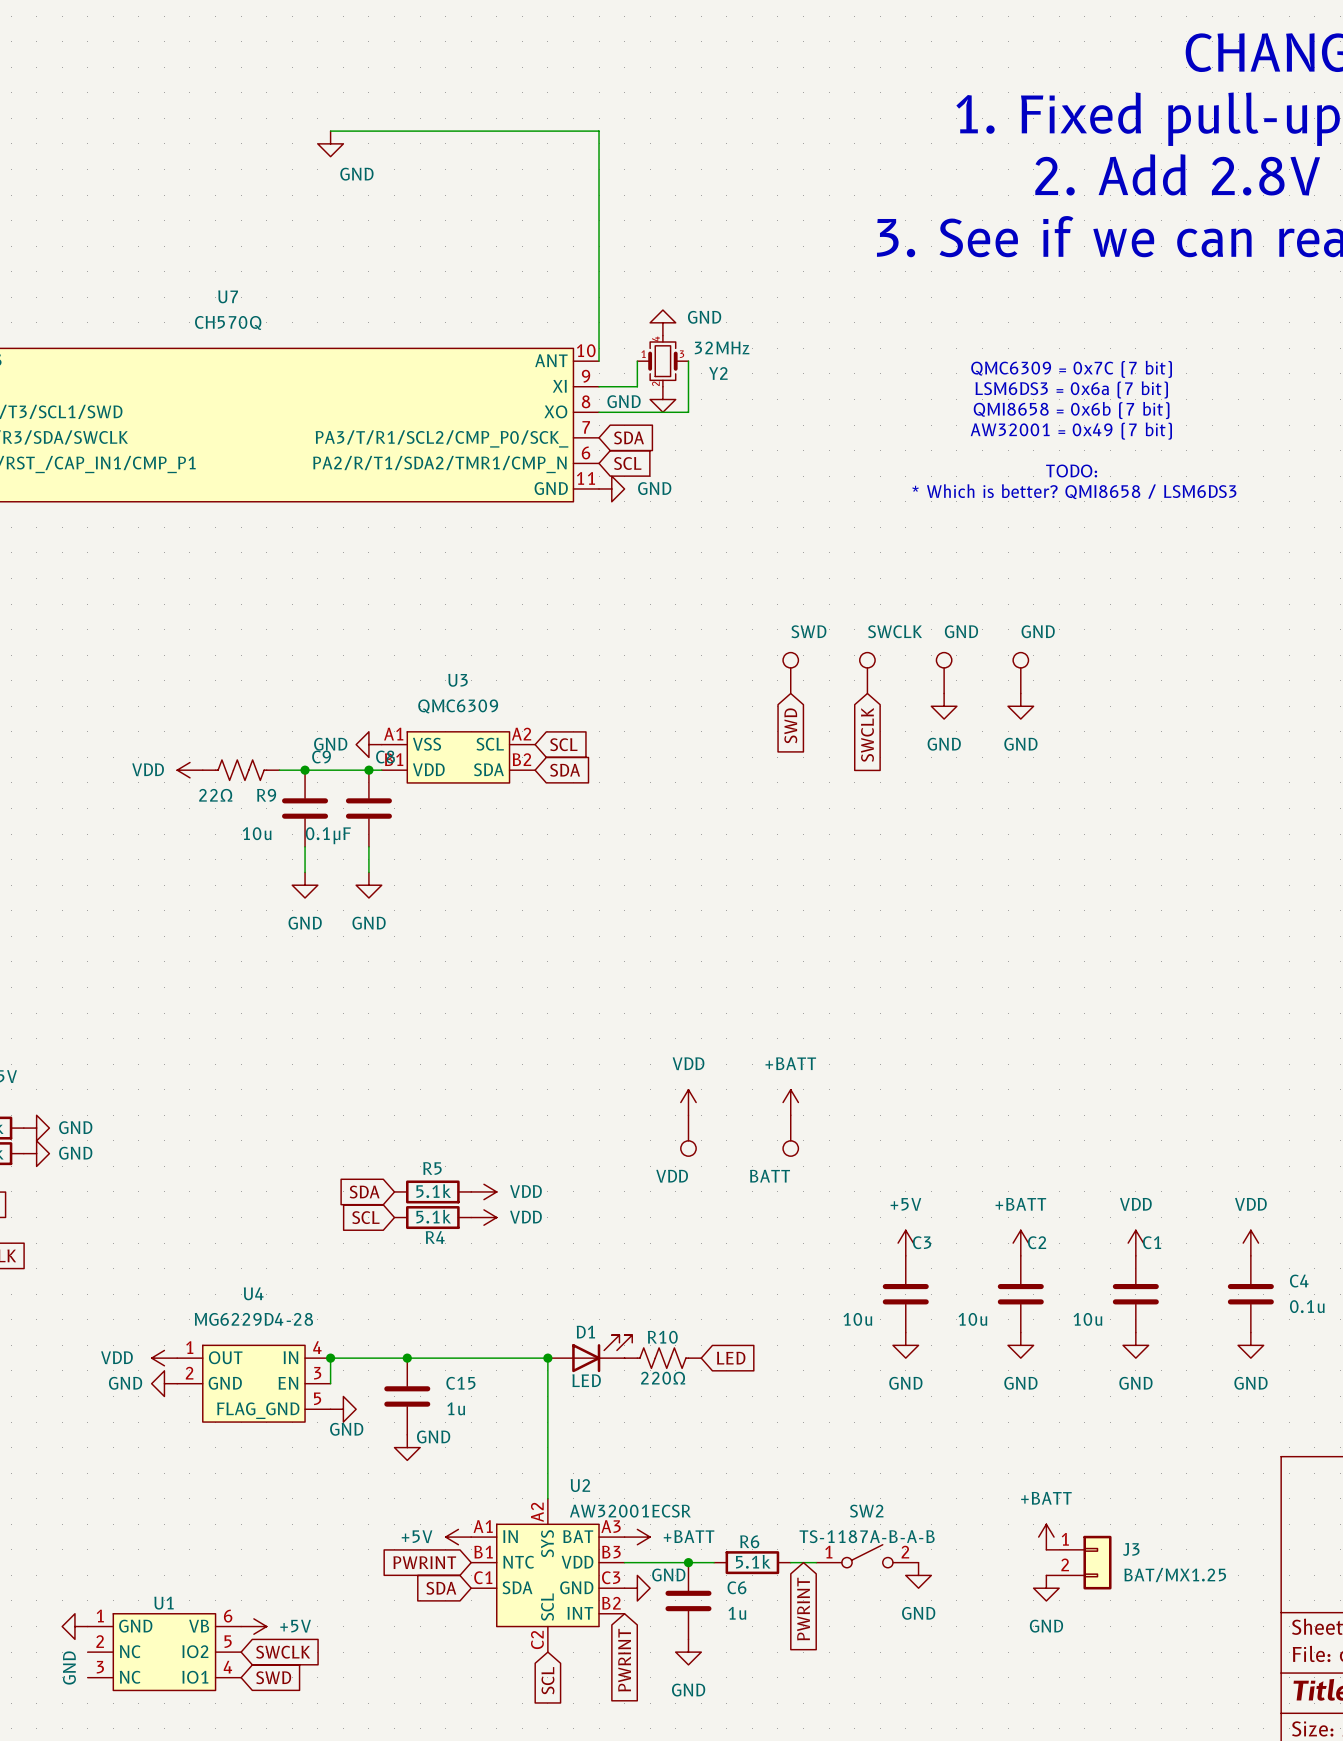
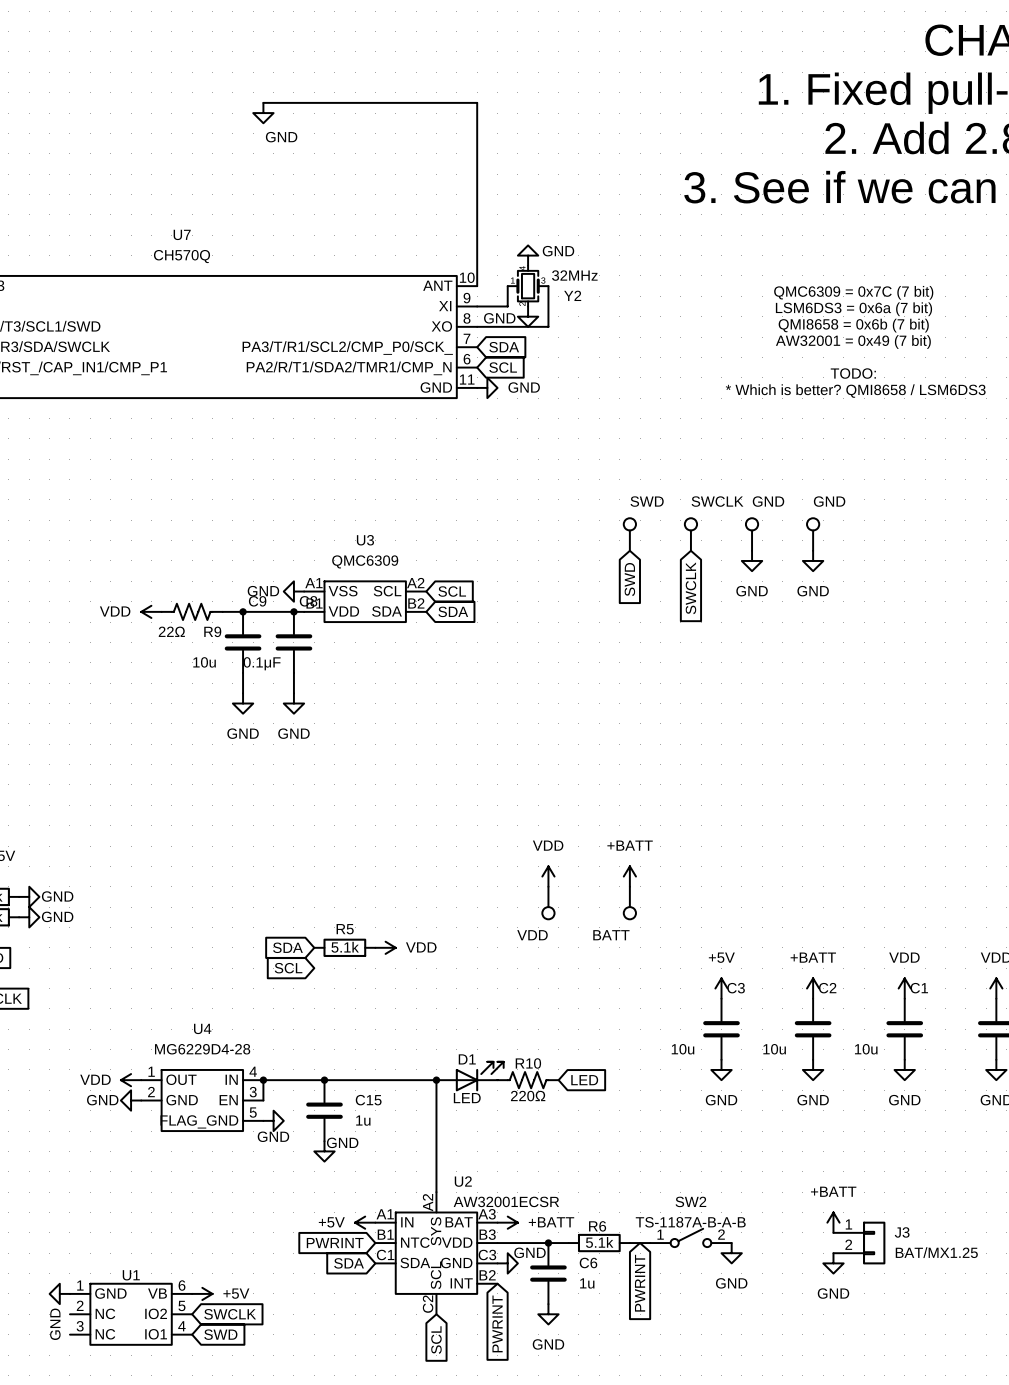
R4: 5.1k (432, 1217) -> none
power symbol: VDD (483, 1217) -> none

